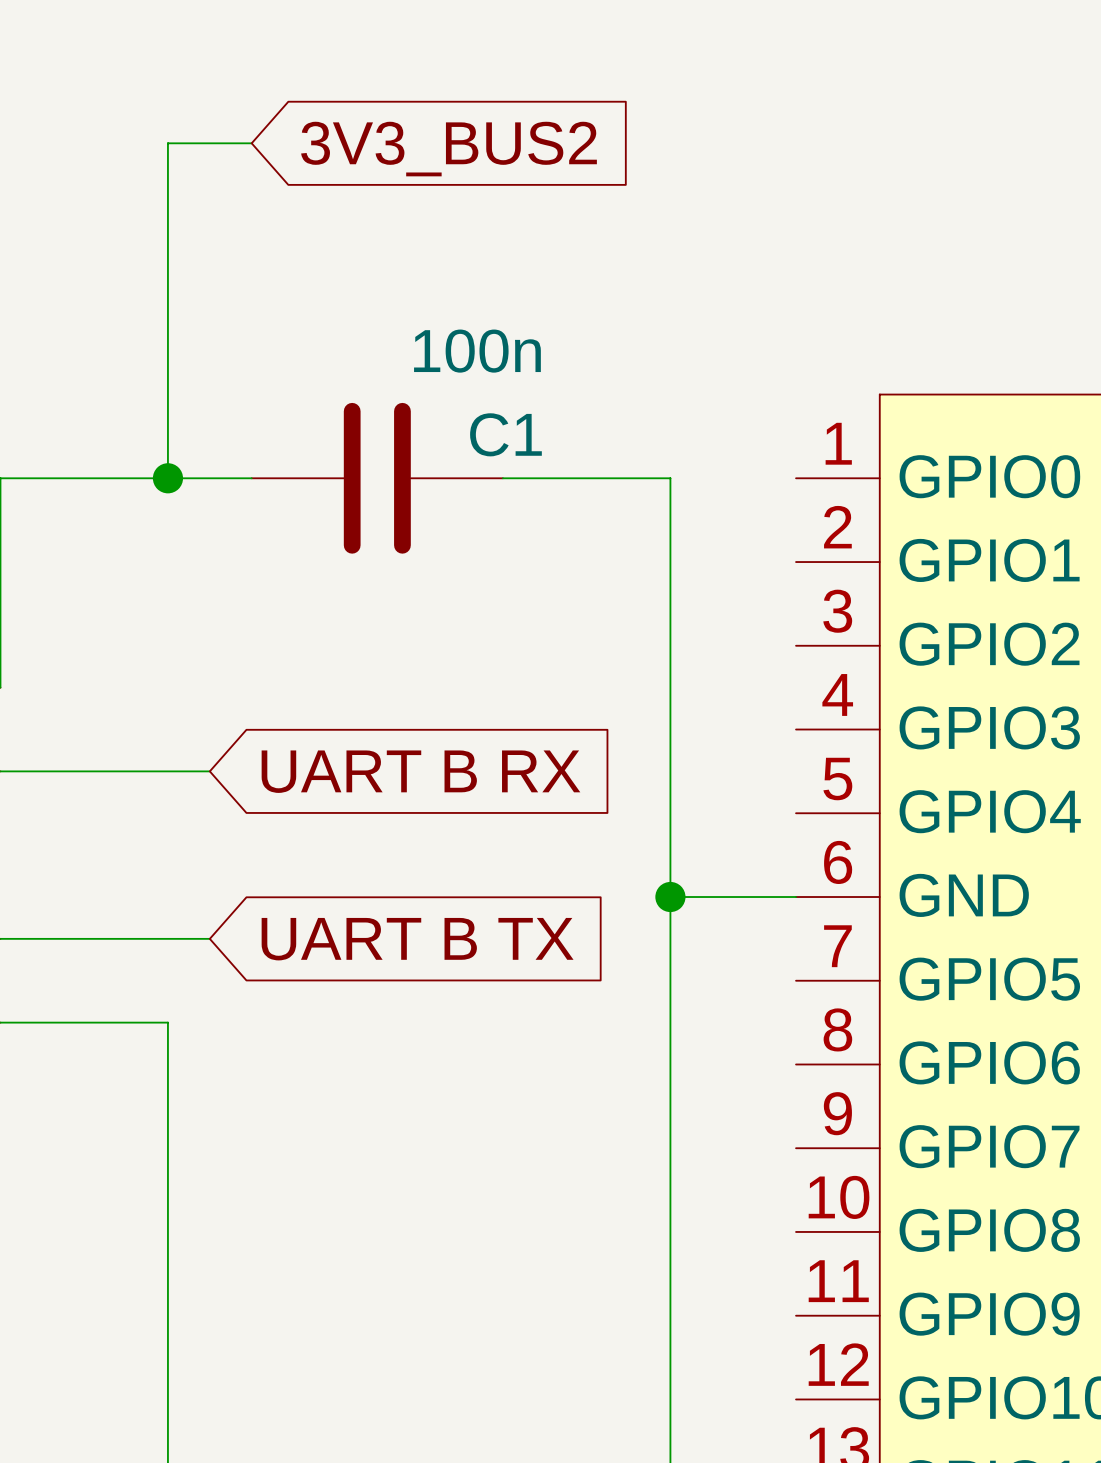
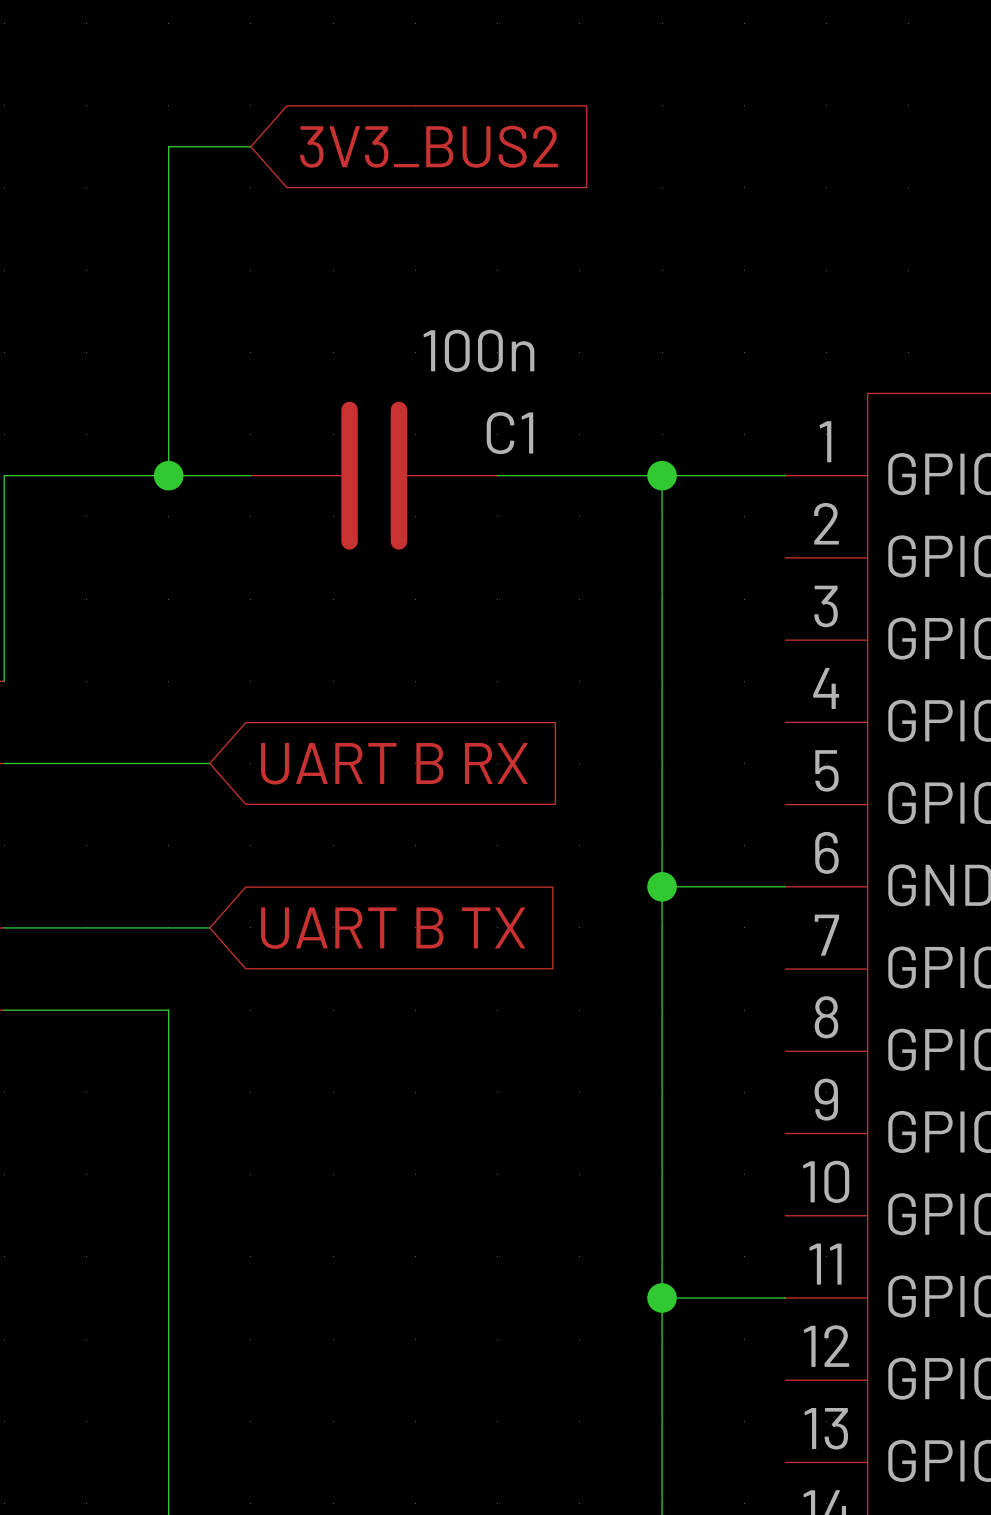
wire: none -> (662, 475) (785, 475)
junction: none -> (662, 475)
wire: none -> (662, 1297) (785, 1297)
junction: none -> (662, 1297)

